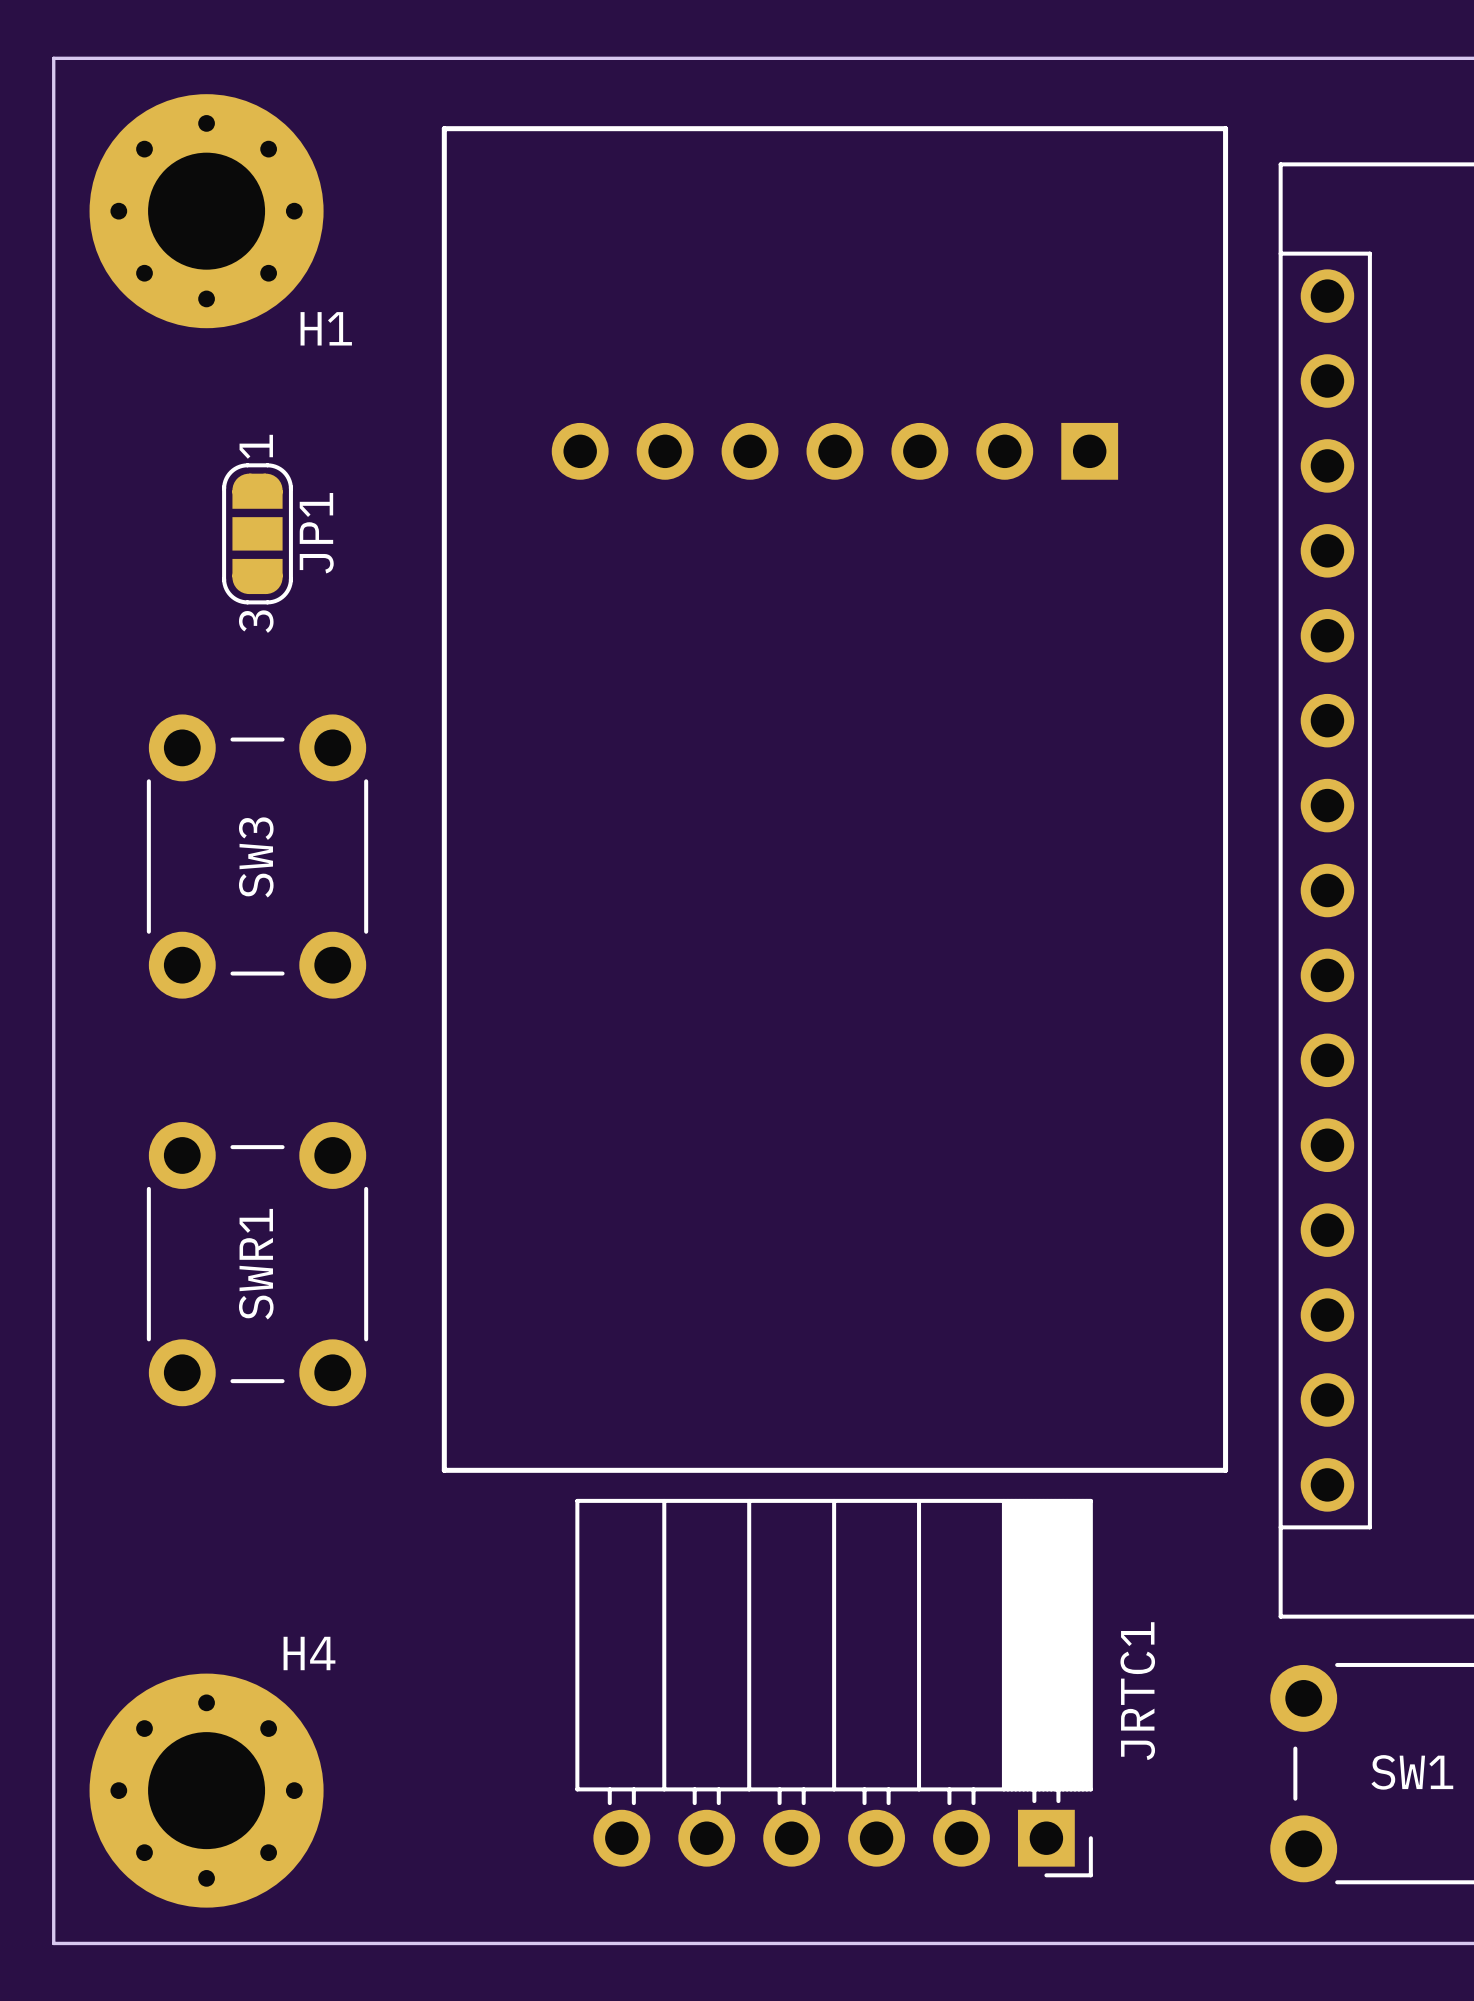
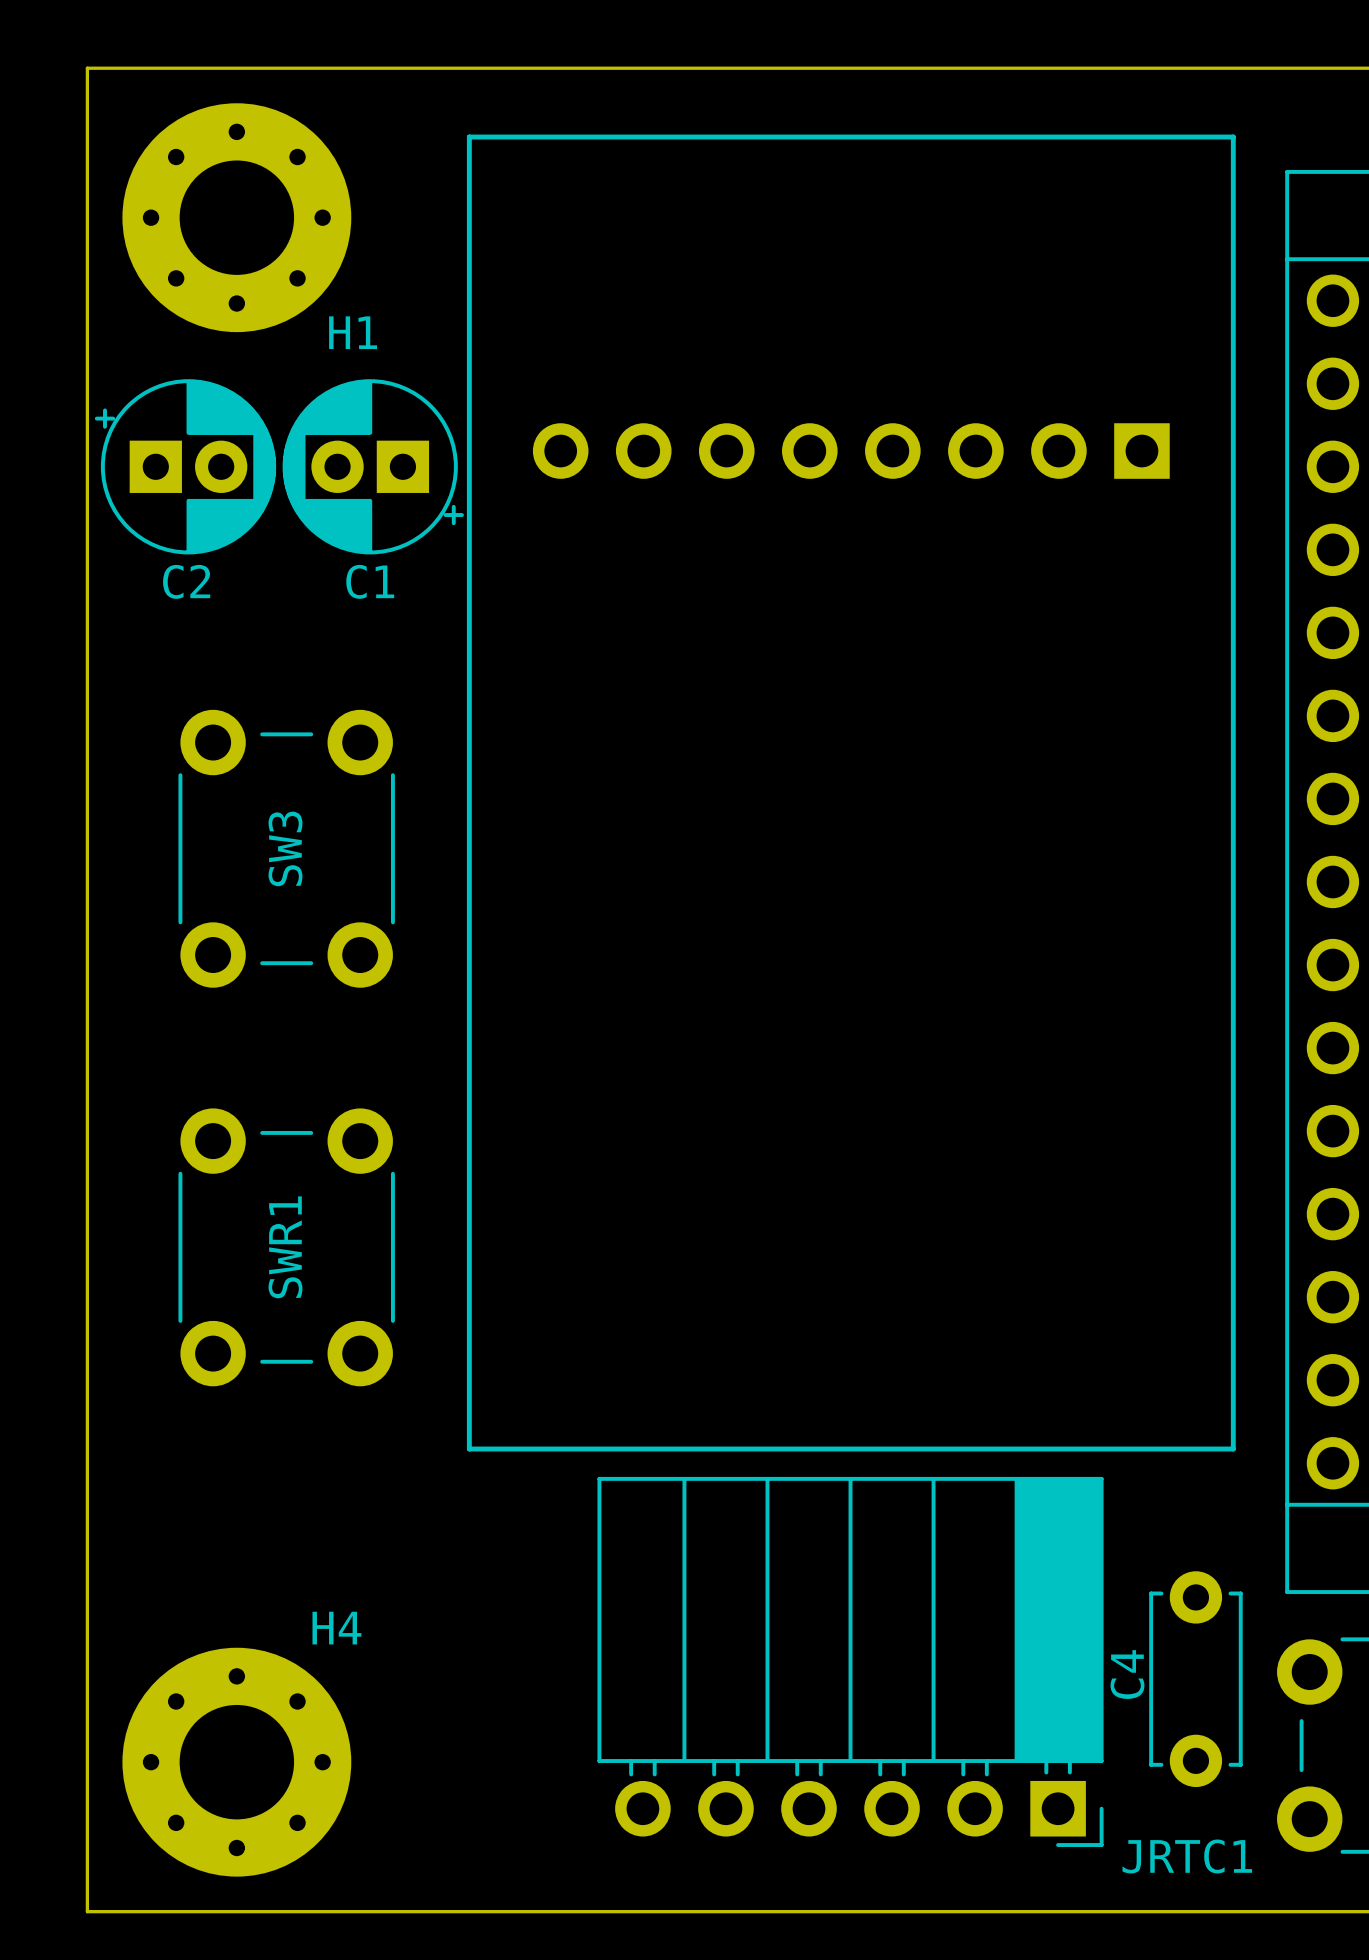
part footprint: [551, 422, 1119, 480] -> [532, 423, 1170, 479]
C2: none -> (185, 466)
C1: none -> (373, 466)
JP1: (257, 533) -> none
JRTC1 name rotation: 0° (1137, 1691) -> 90° clockwise (1187, 1856)
JRTC1 name position: JRTC1 (1137, 1691) -> JRTC1 (1187, 1856)
C4: none -> (1195, 1679)

